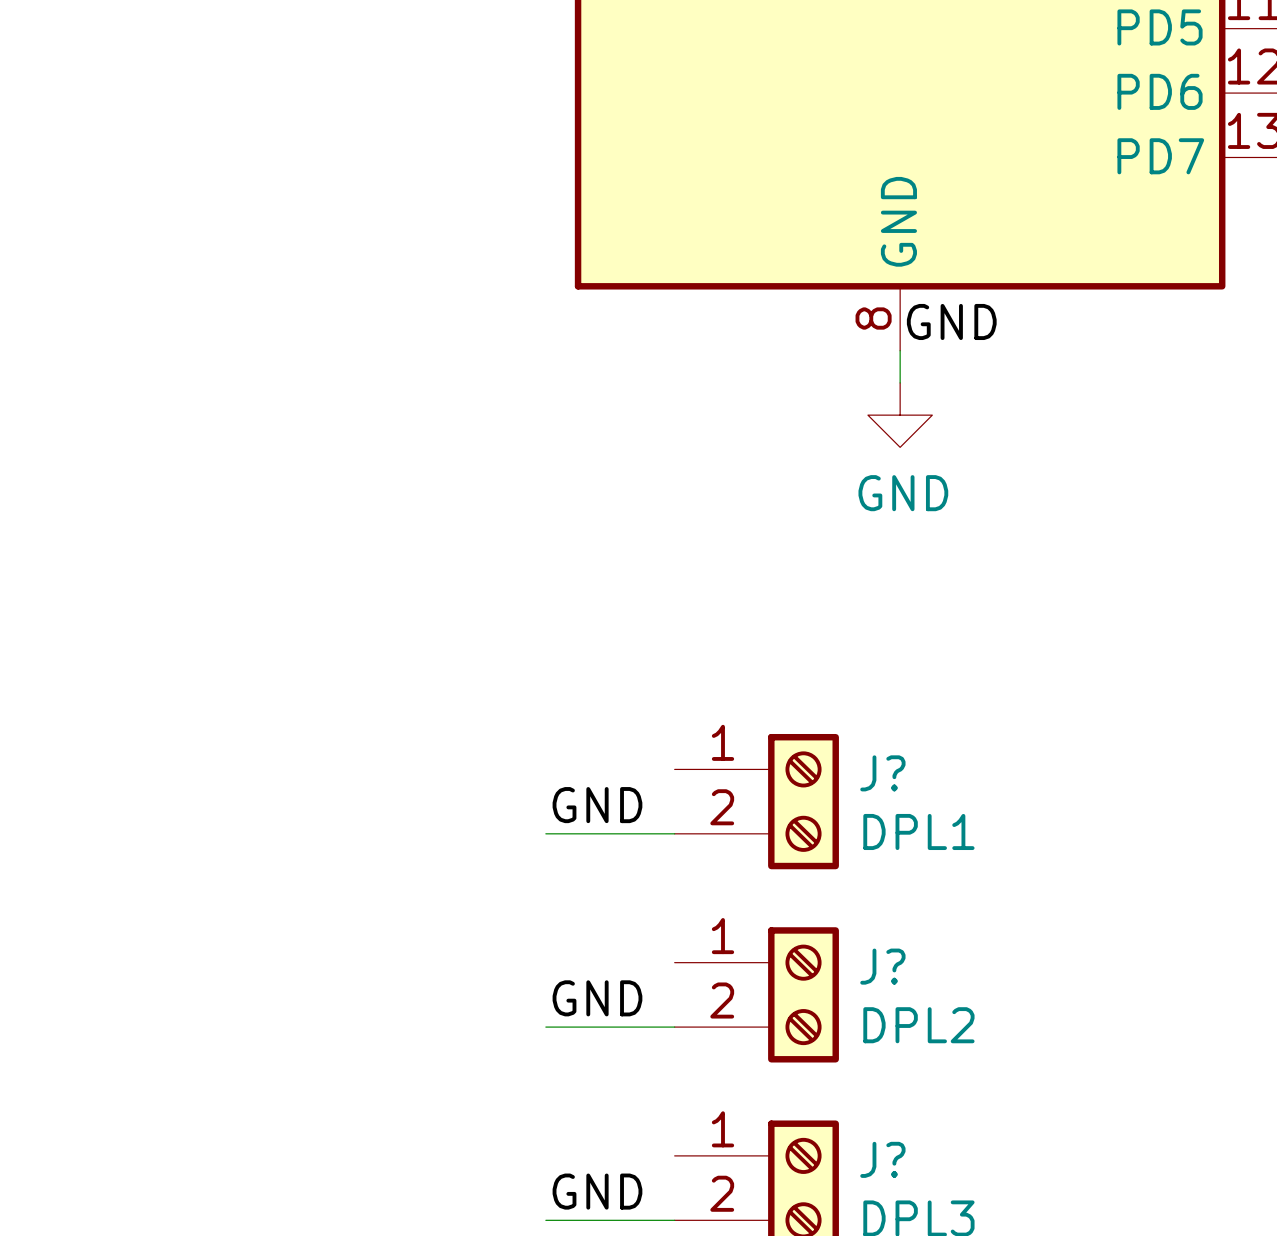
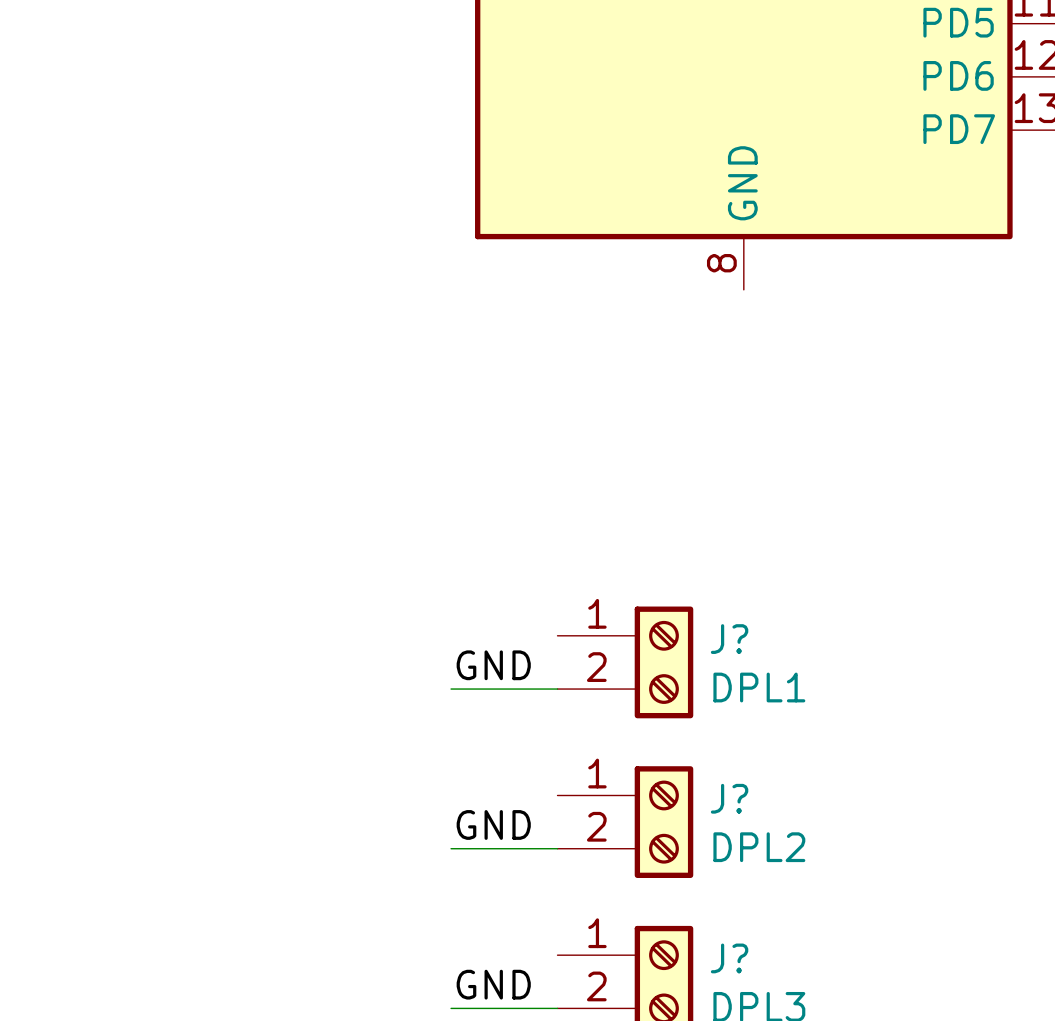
label: GND (951, 321) -> none
wire: (900, 350) (900, 382) -> none
power symbol: GND (900, 415) -> none

